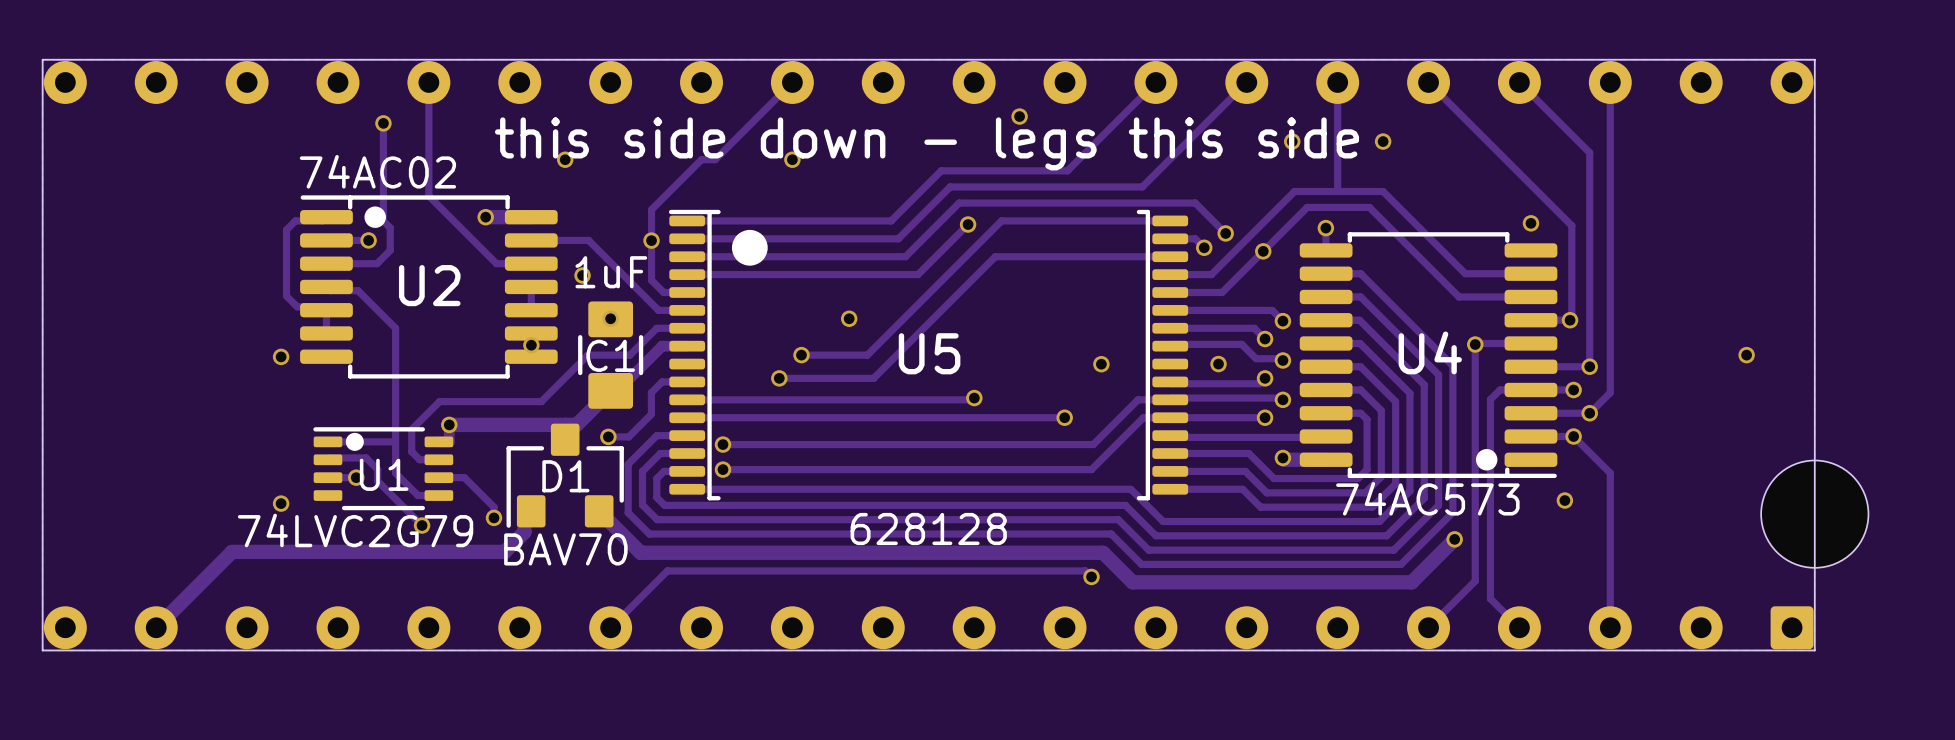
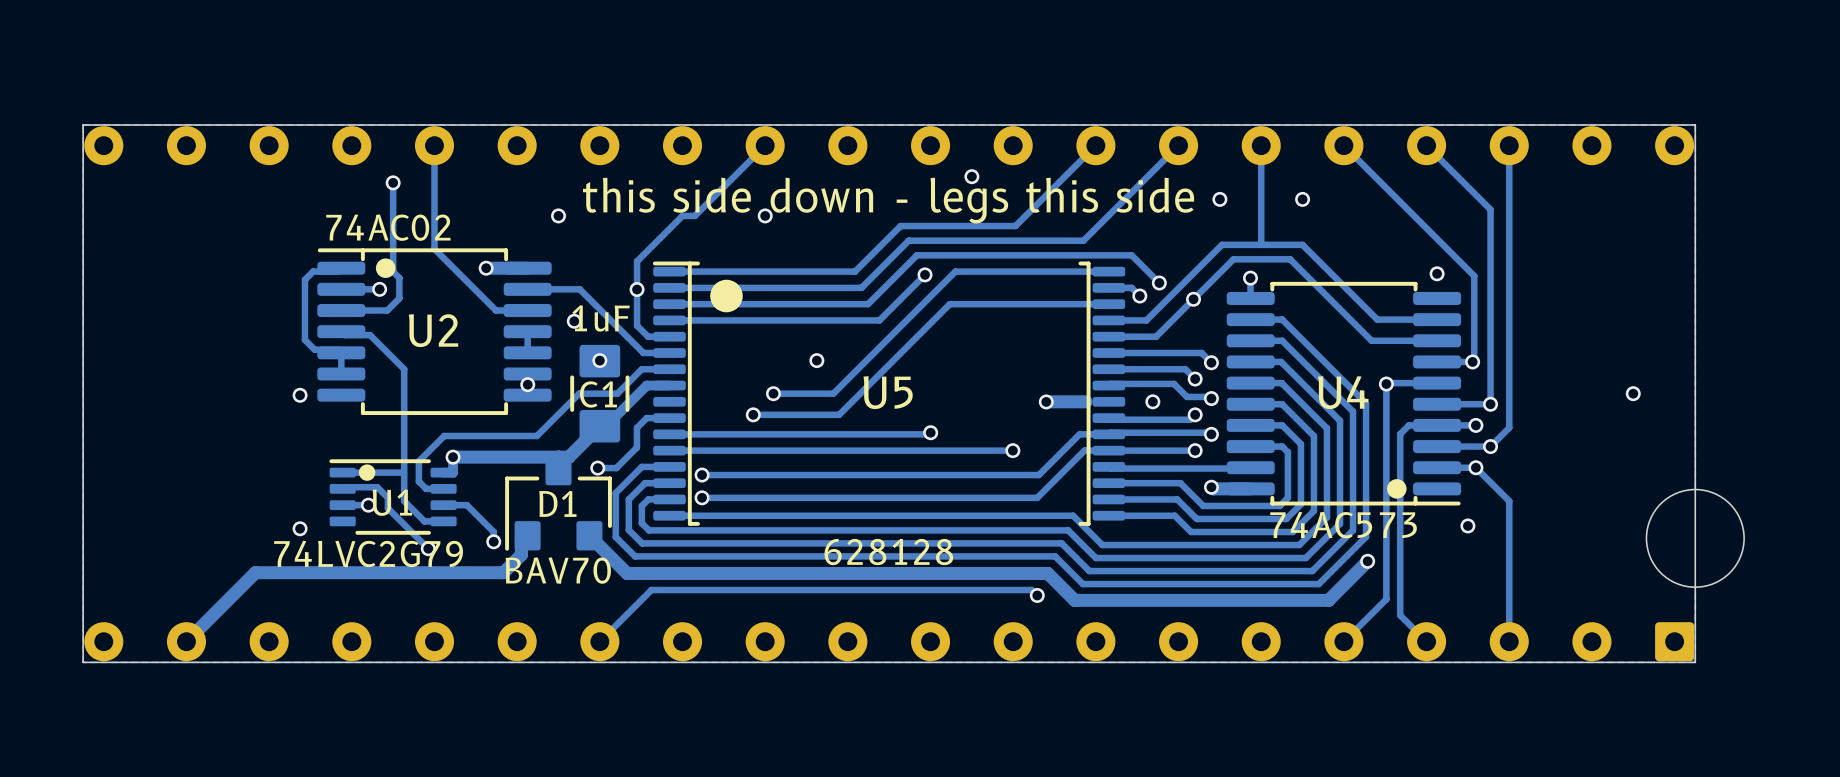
track: none -> (1086, 401) (1046, 401)

